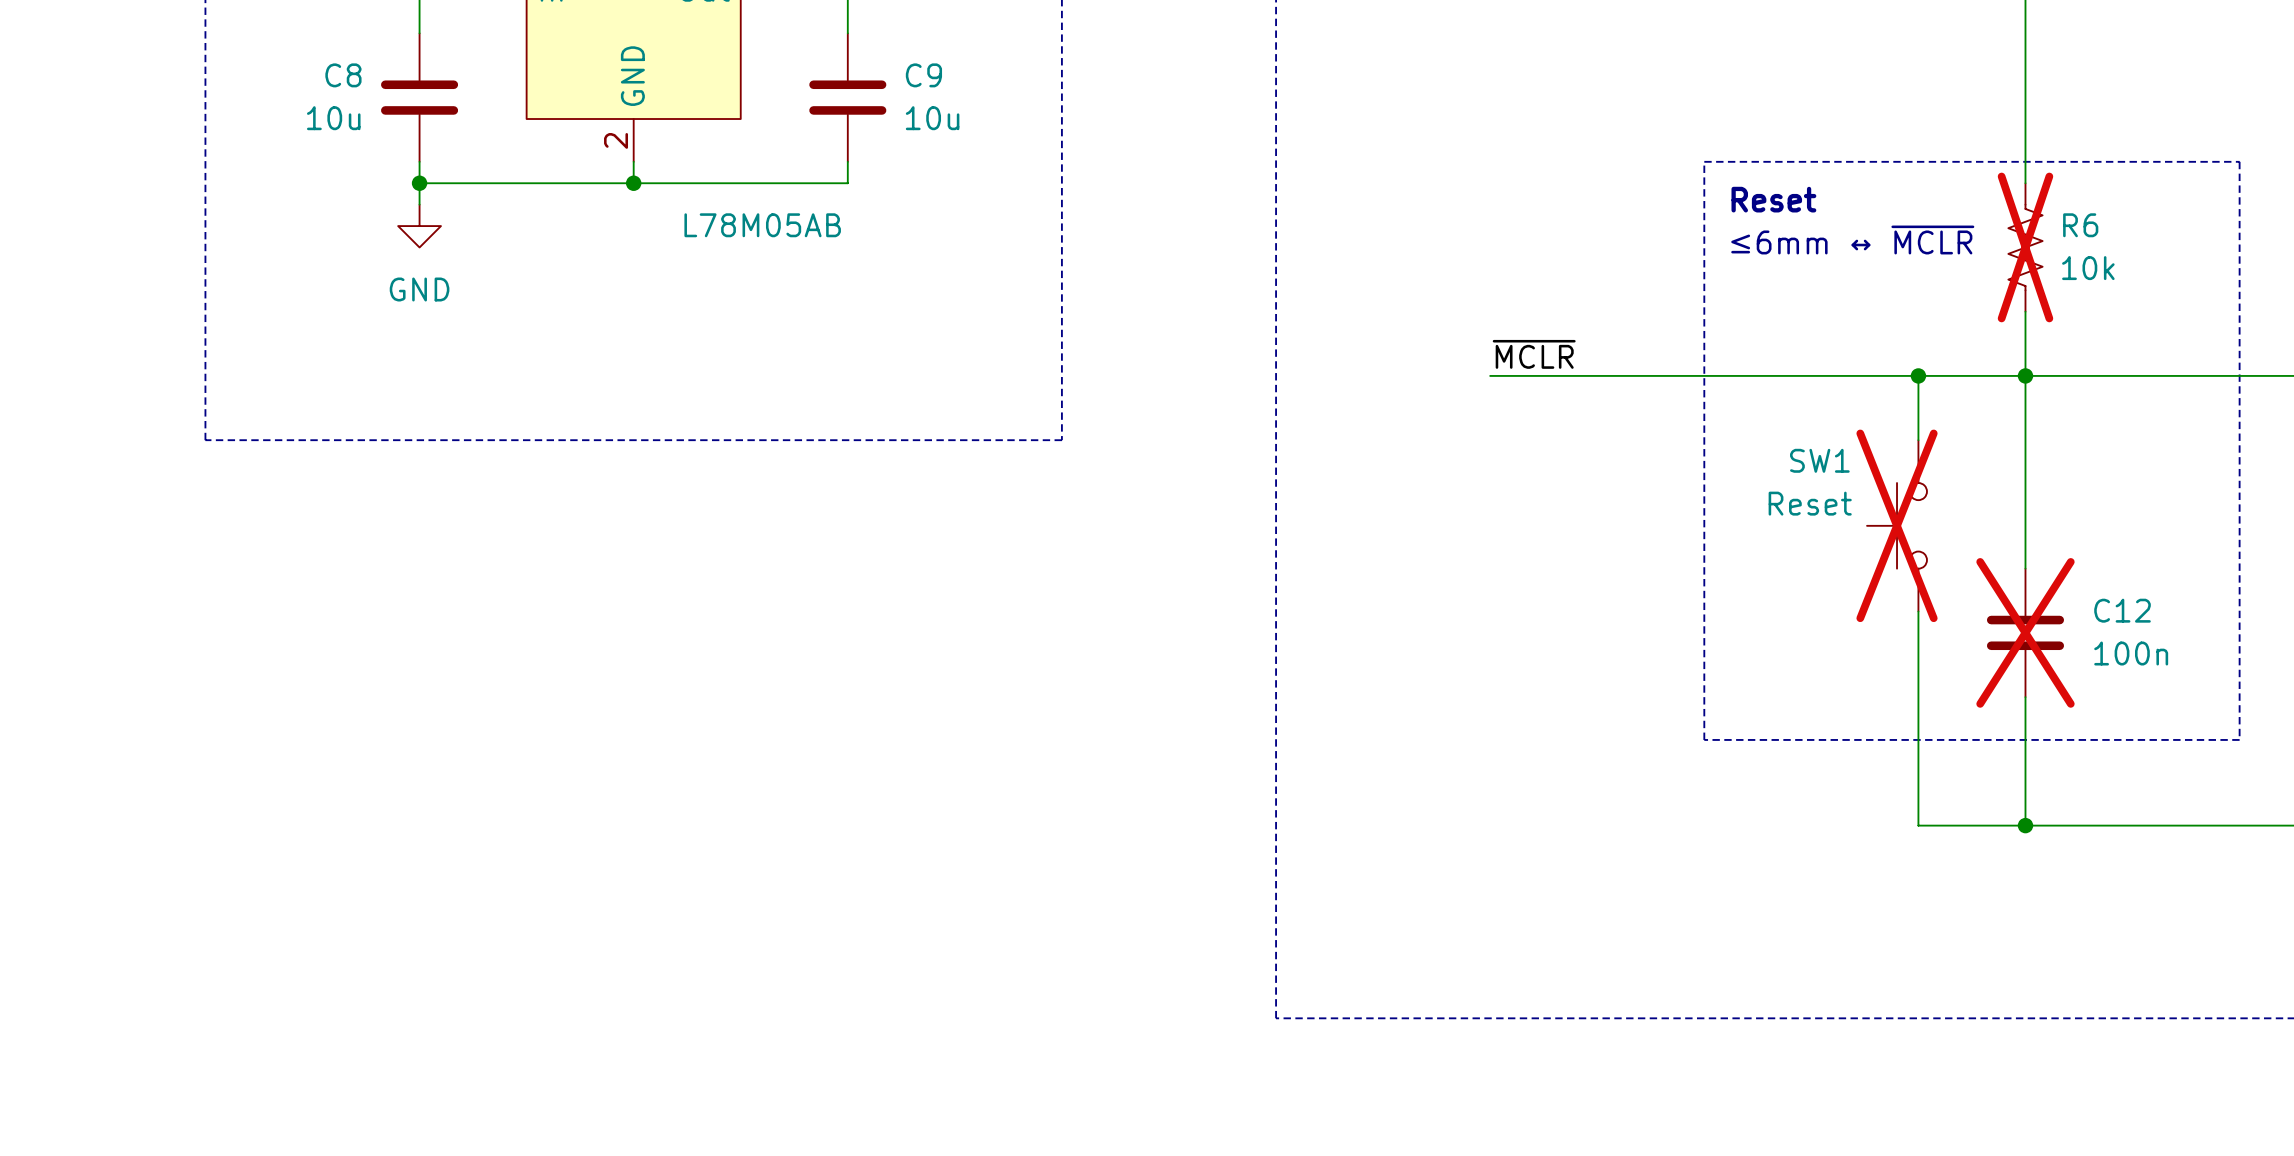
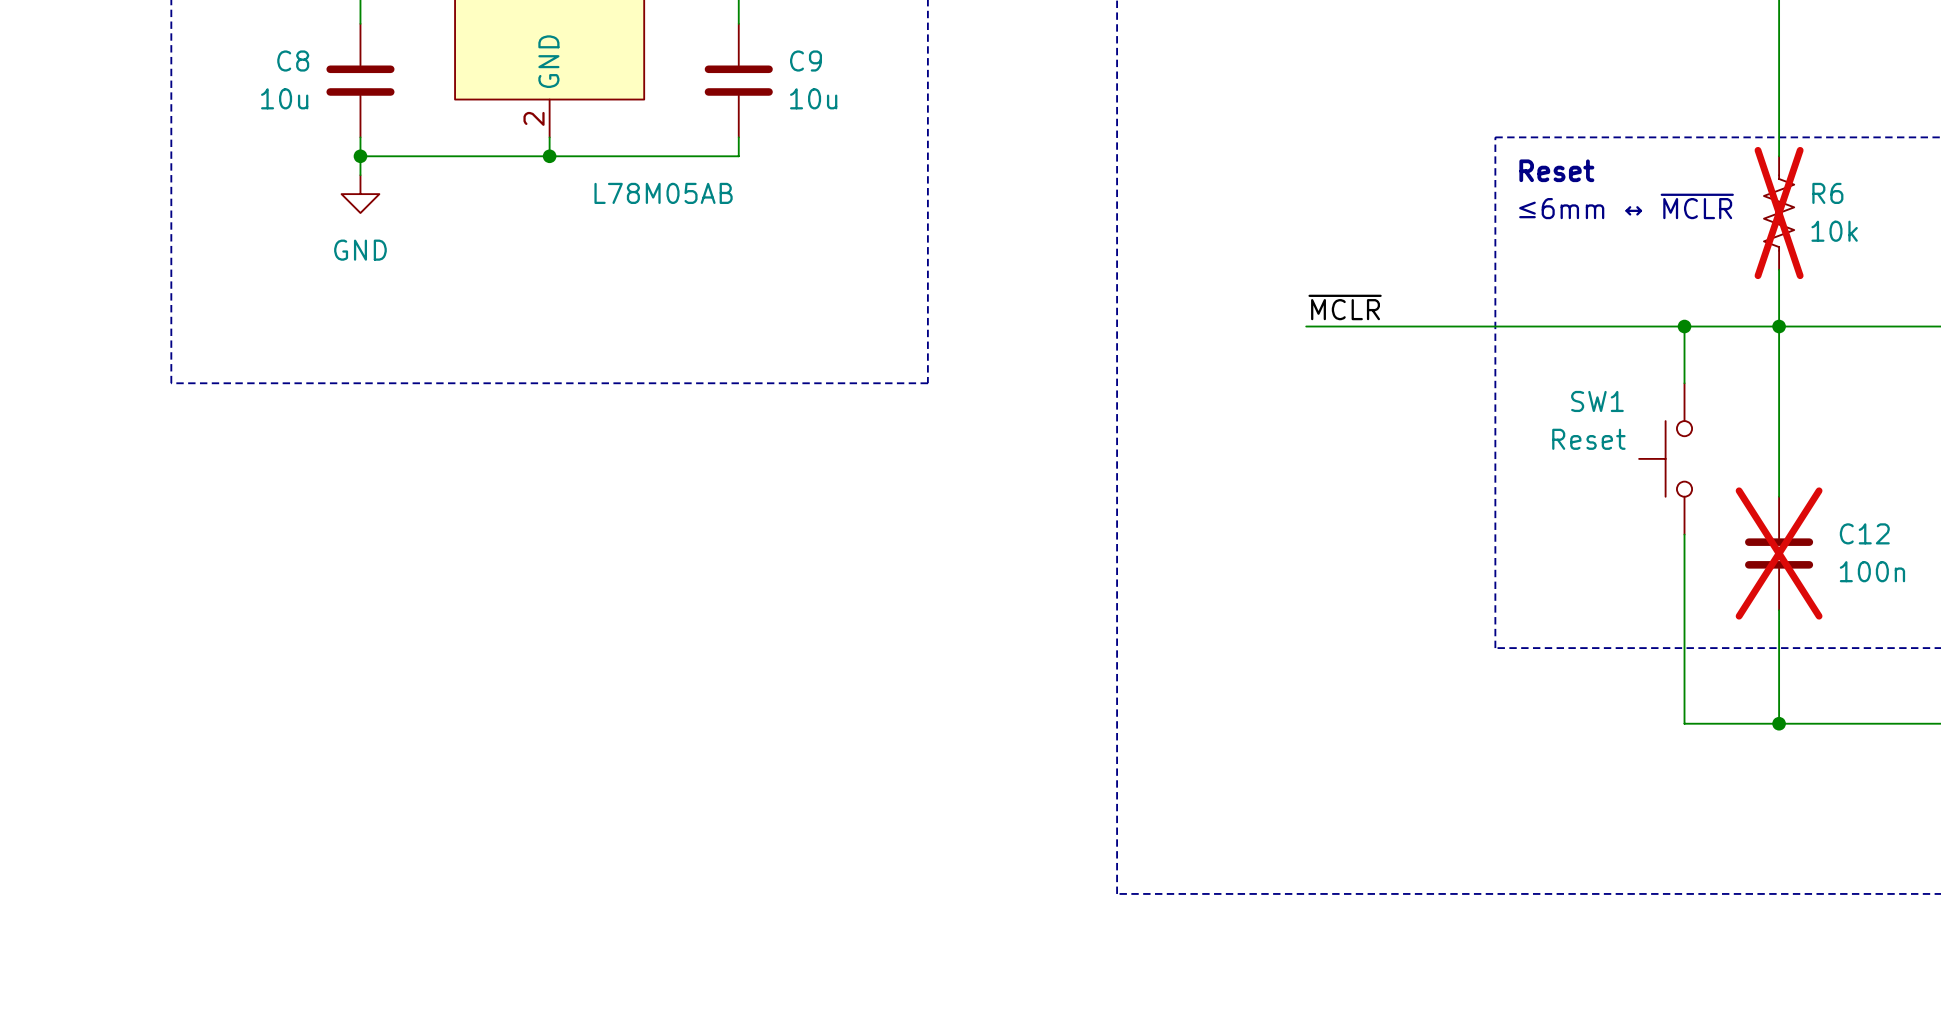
SW1 do-not-place cross: (1897, 525) -> none

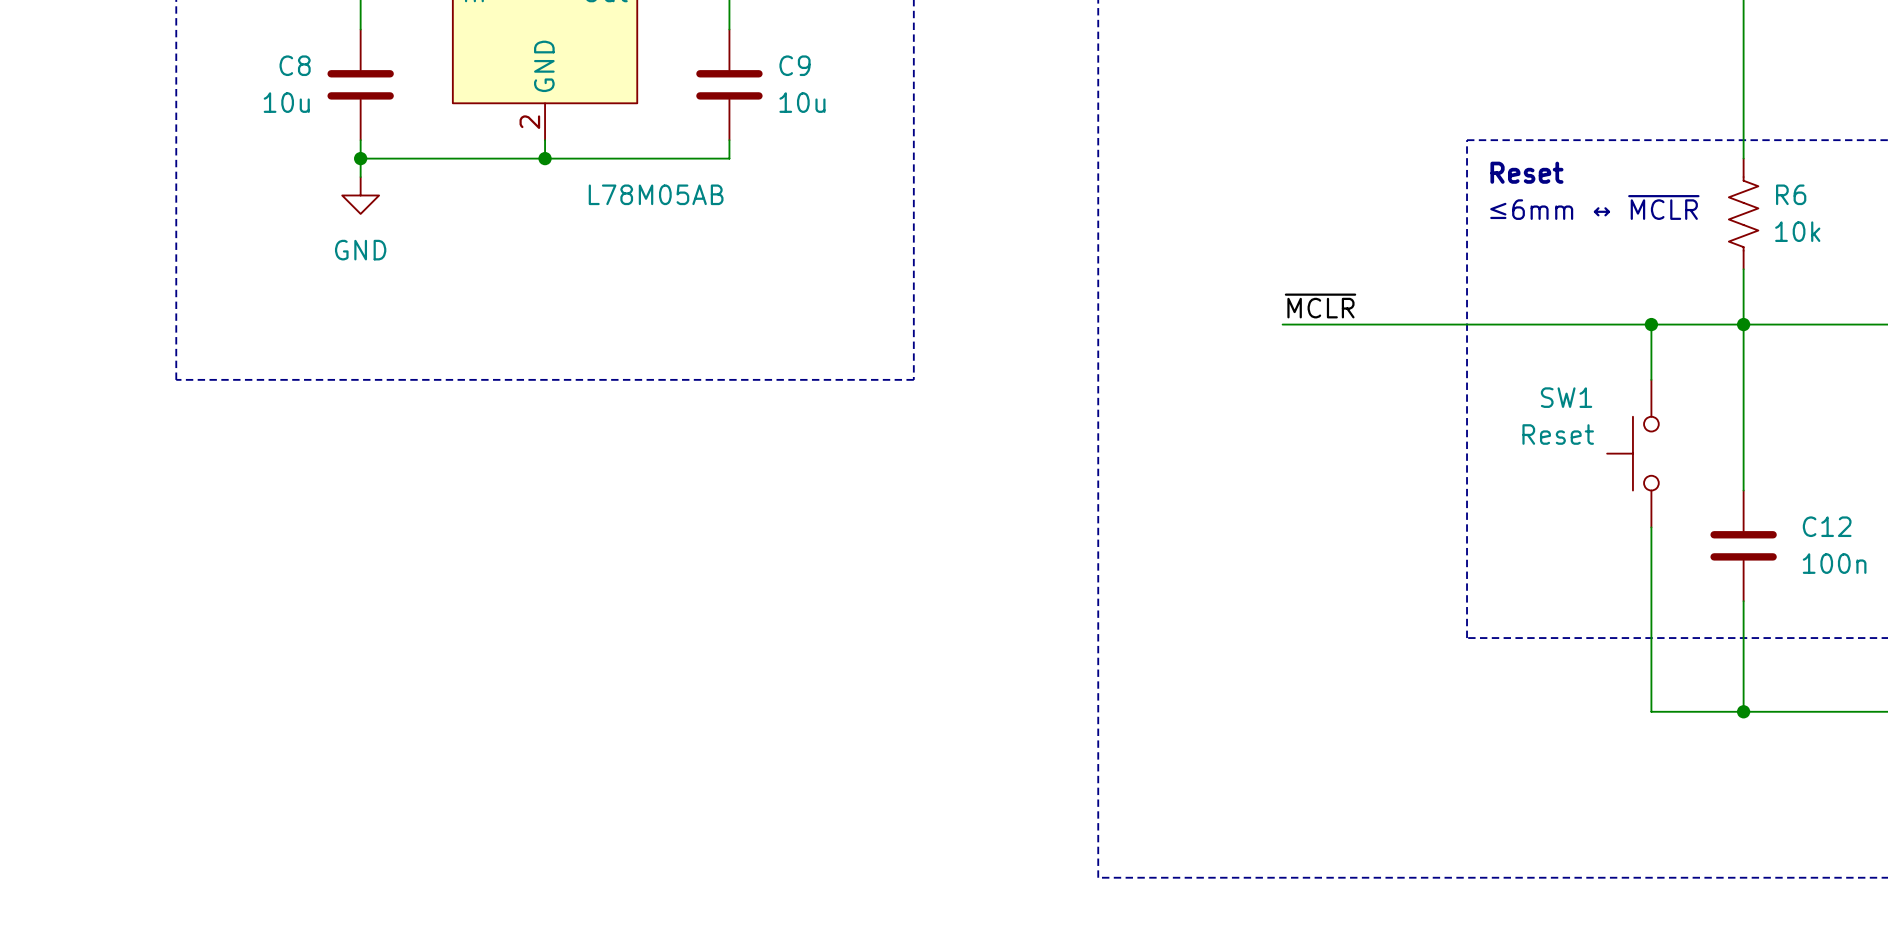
R6 do-not-place cross: (1779, 213) -> none
C12 do-not-place cross: (1779, 553) -> none

